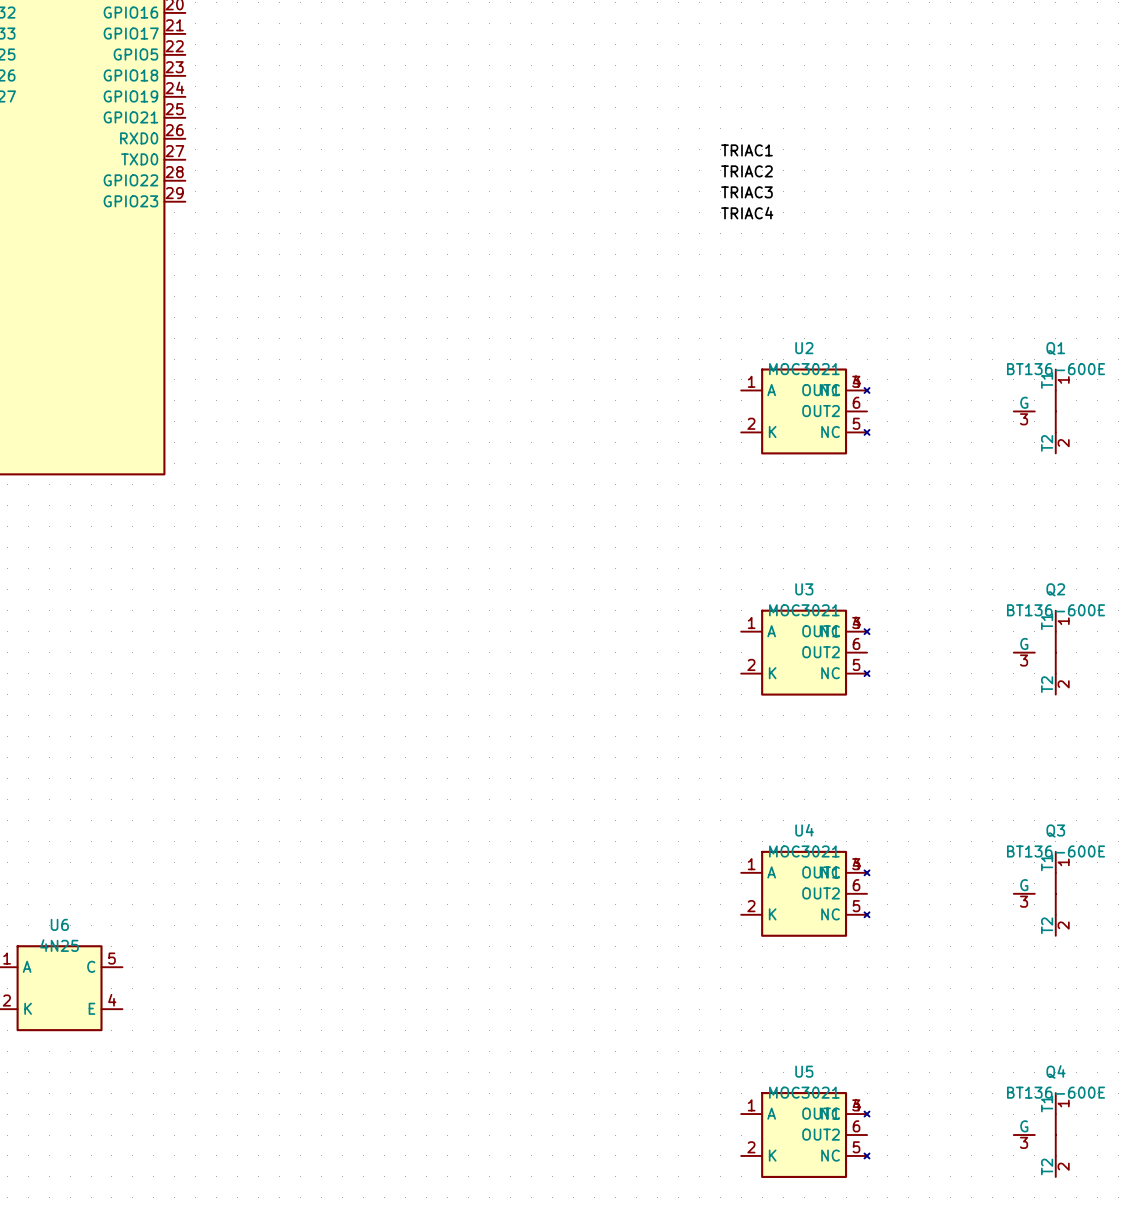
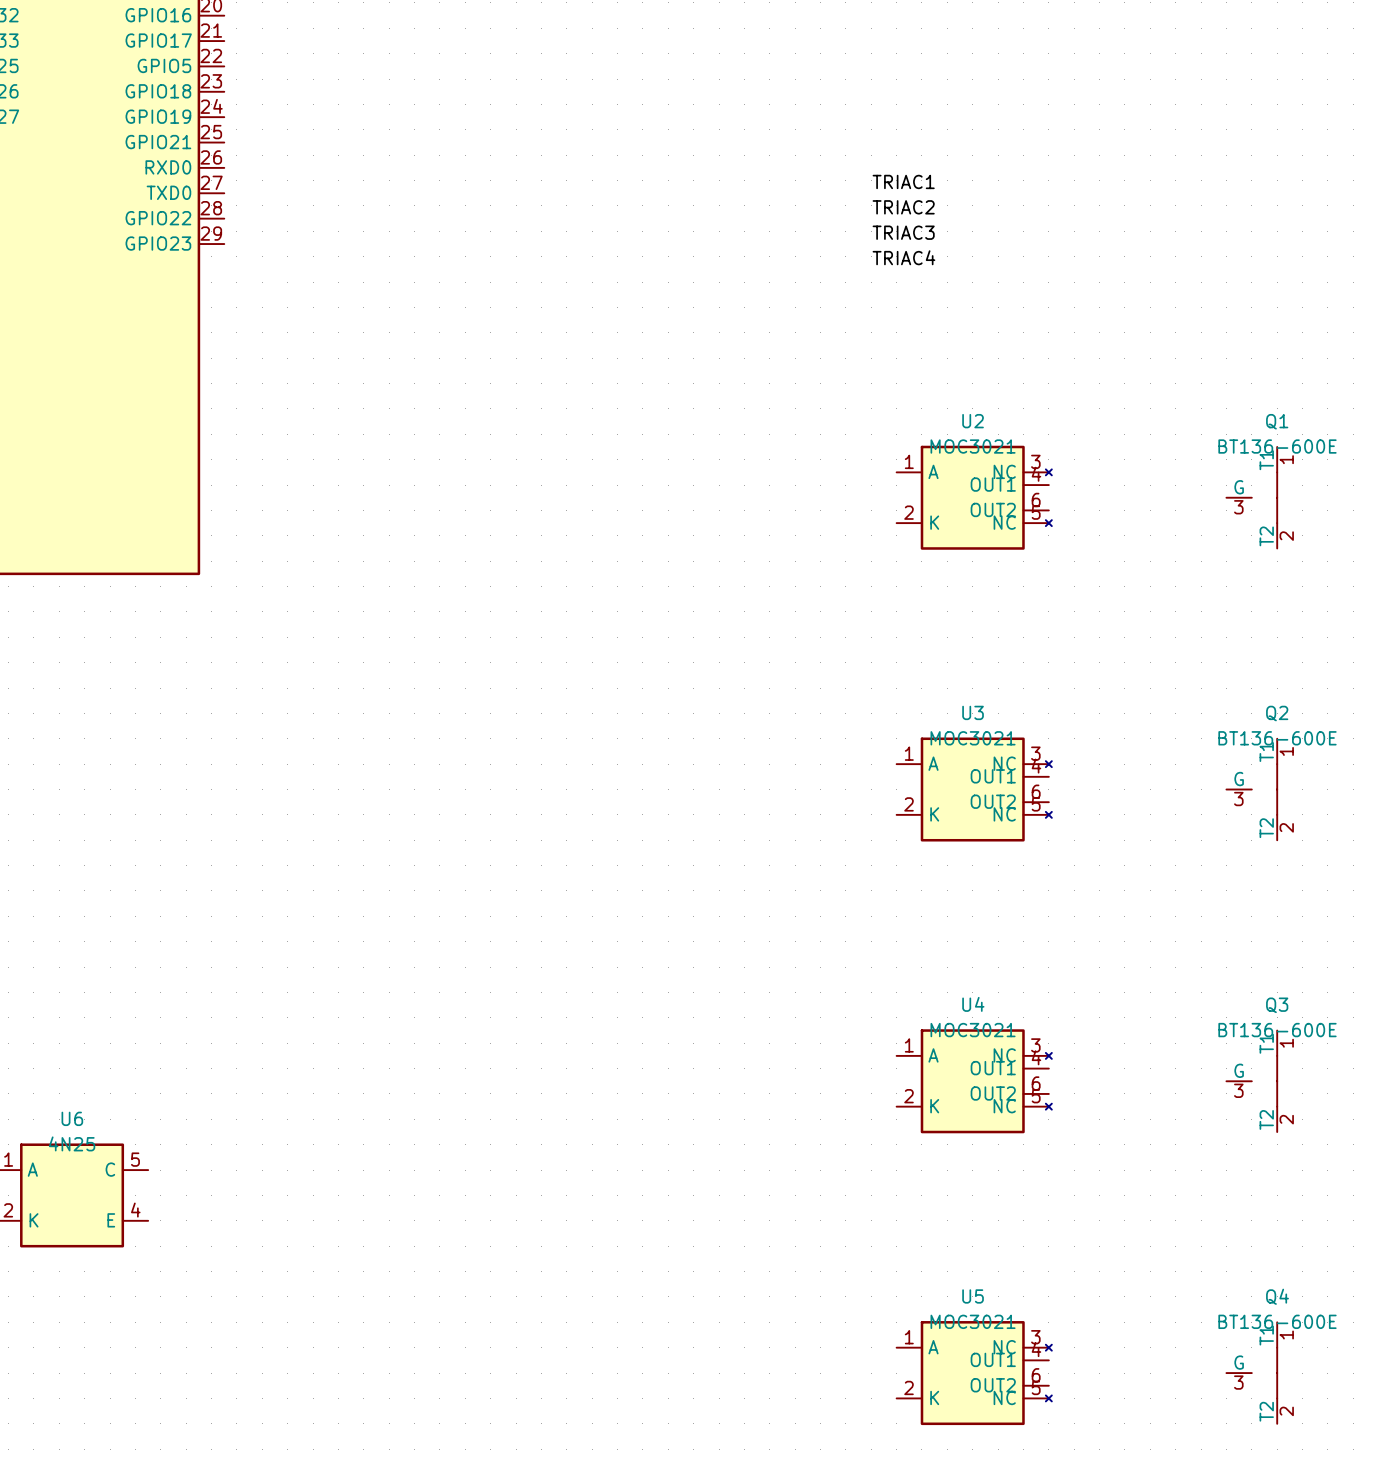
U2 symbol: [741, 368, 870, 455] -> [896, 445, 1052, 550]
U3 symbol: [741, 609, 870, 696] -> [896, 737, 1052, 842]
U4 symbol: [741, 850, 870, 937] -> [896, 1029, 1052, 1134]
U5 symbol: [741, 1092, 870, 1179] -> [896, 1321, 1052, 1426]

